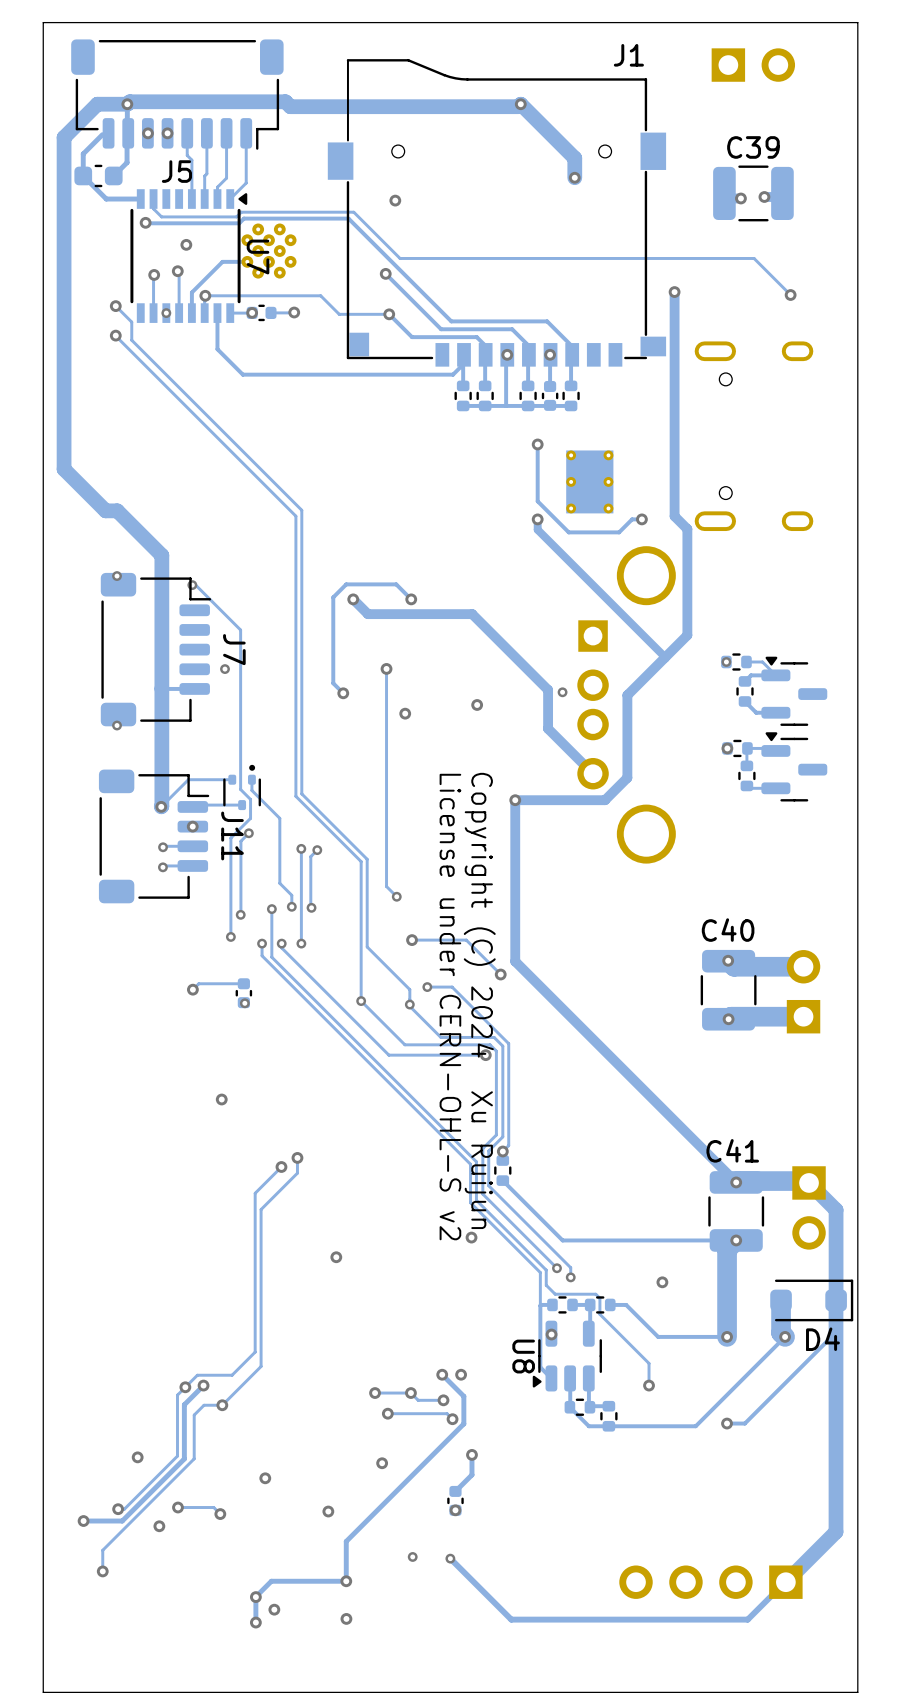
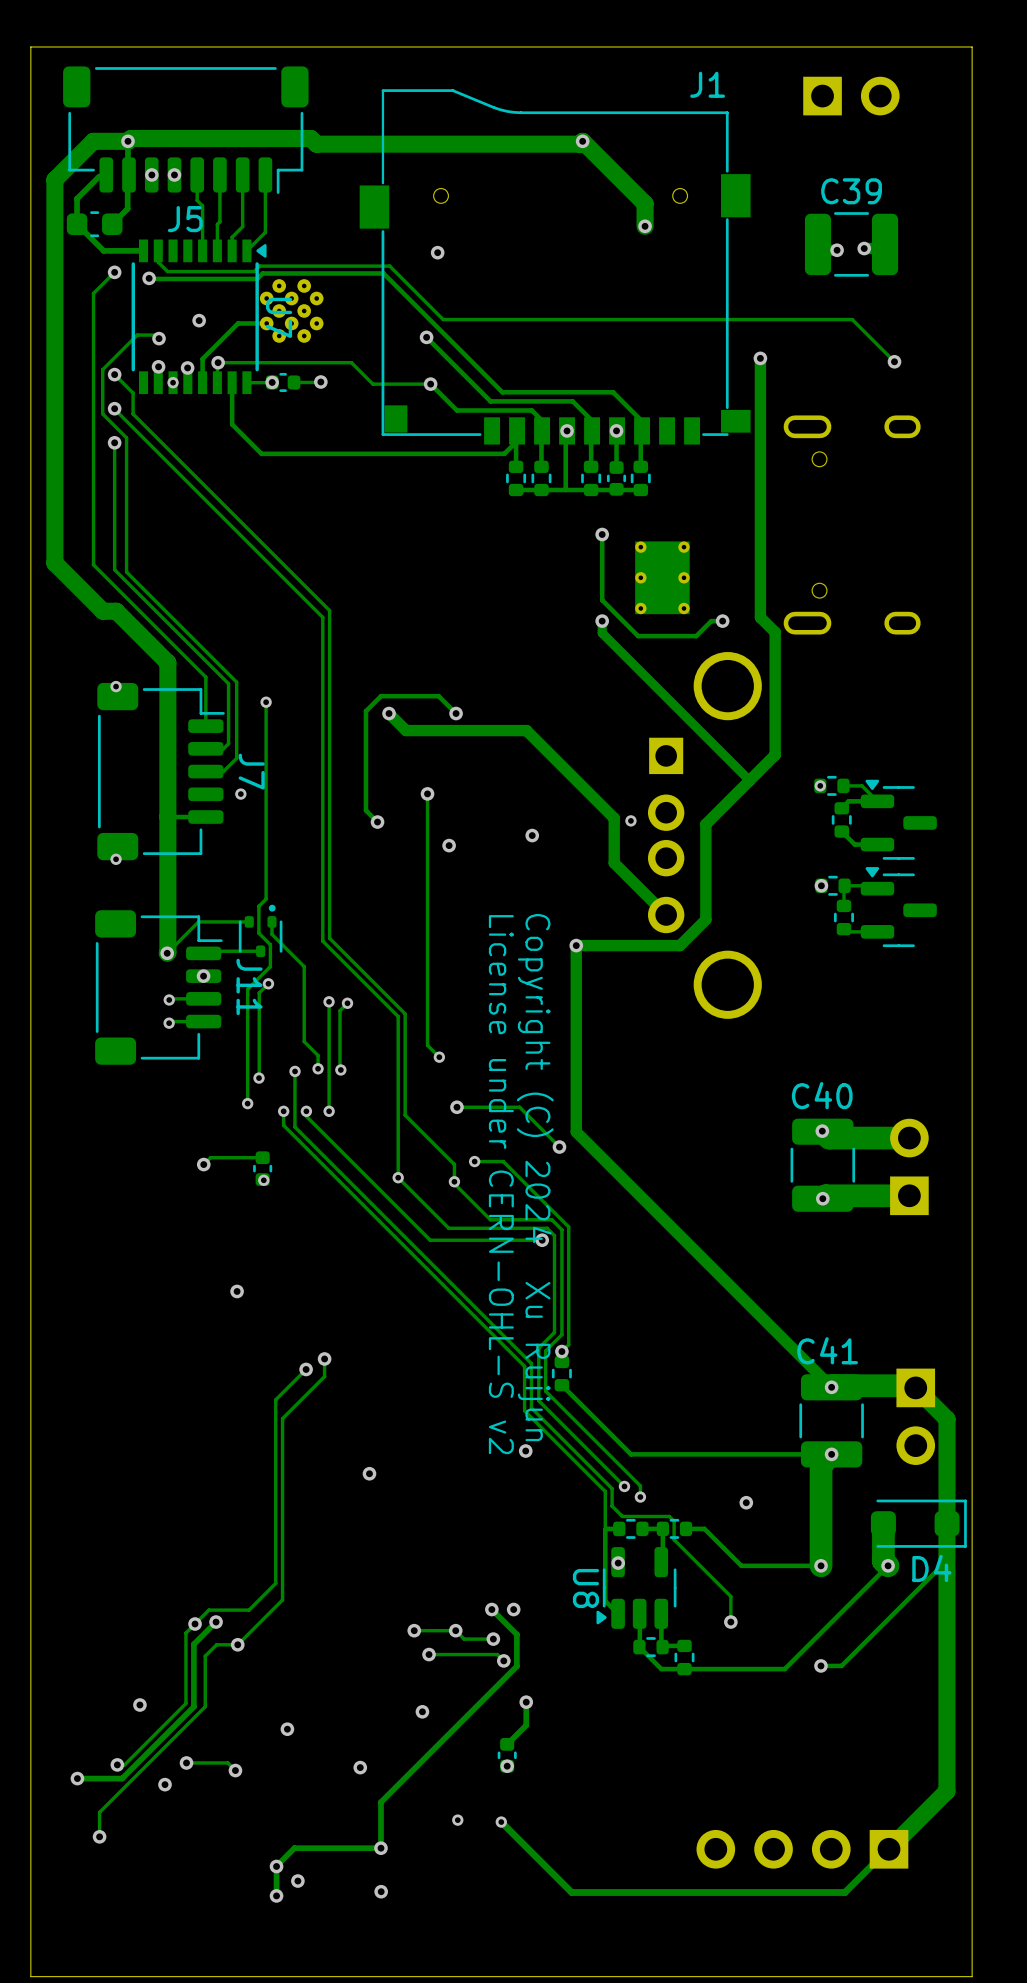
track: none -> (114, 272) (93, 293) (93, 564) (205, 677) (205, 726)
via: none -> (114, 272)
via: (186, 244) -> none
via: none -> (199, 320)
track: none -> (156, 335) (137, 335) (102, 369) (102, 414) (126, 437) (126, 572) (236, 682) (236, 758) (223, 771) (205, 771)
track: (177, 271) (179, 300) -> none
via: (177, 271) -> none
track: (154, 274) (153, 299) -> none
via: none -> (158, 366)
via: none -> (187, 367)
track: none -> (114, 442) (114, 569) (228, 683) (228, 743) (223, 748) (205, 748)
via: none -> (114, 442)
track: (192, 585) (195, 585) (240, 630) (240, 766) -> (266, 702) (266, 899) (258, 906)
via position: (192, 585) -> (266, 702)

